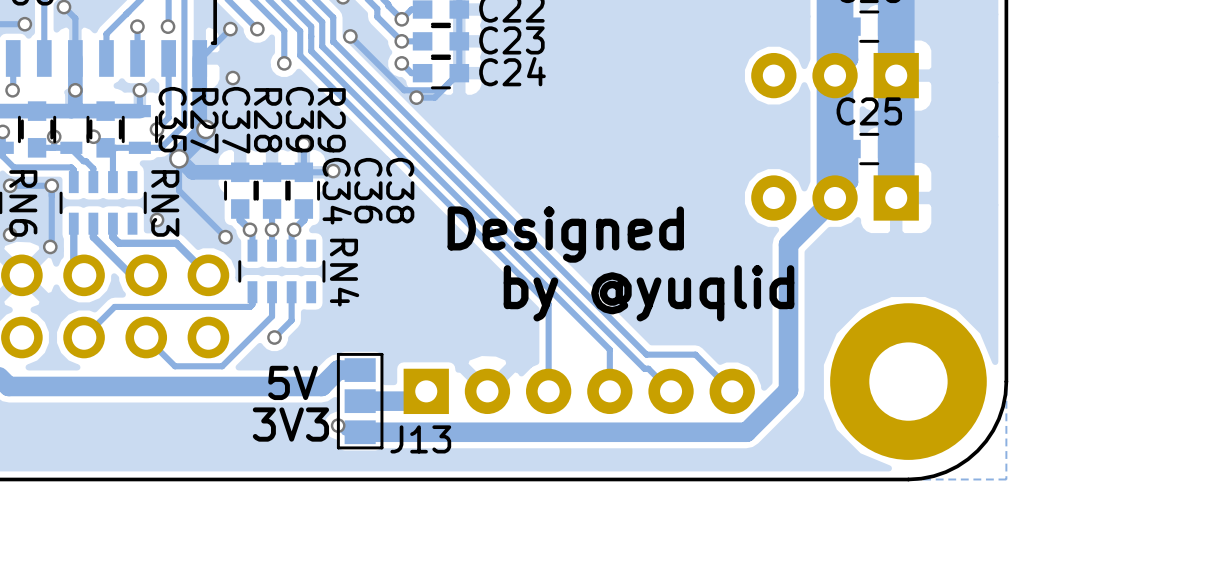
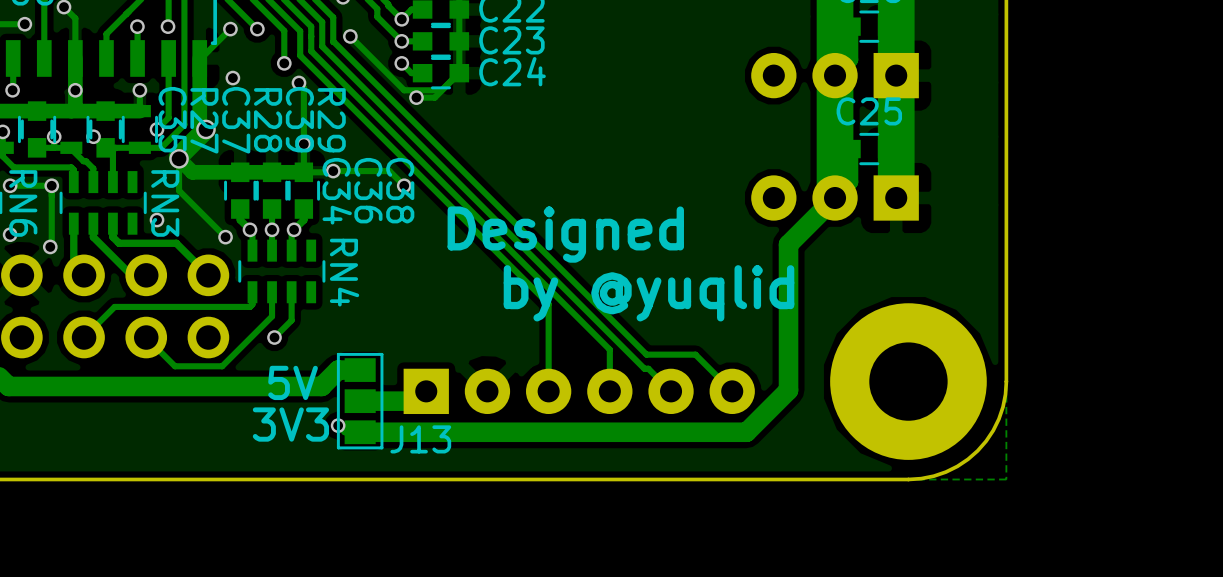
track: none -> (298, 82) (303, 87) (303, 144)
via: none -> (298, 82)
track: none -> (333, 171) (389, 171) (404, 185)
via: none -> (404, 185)

